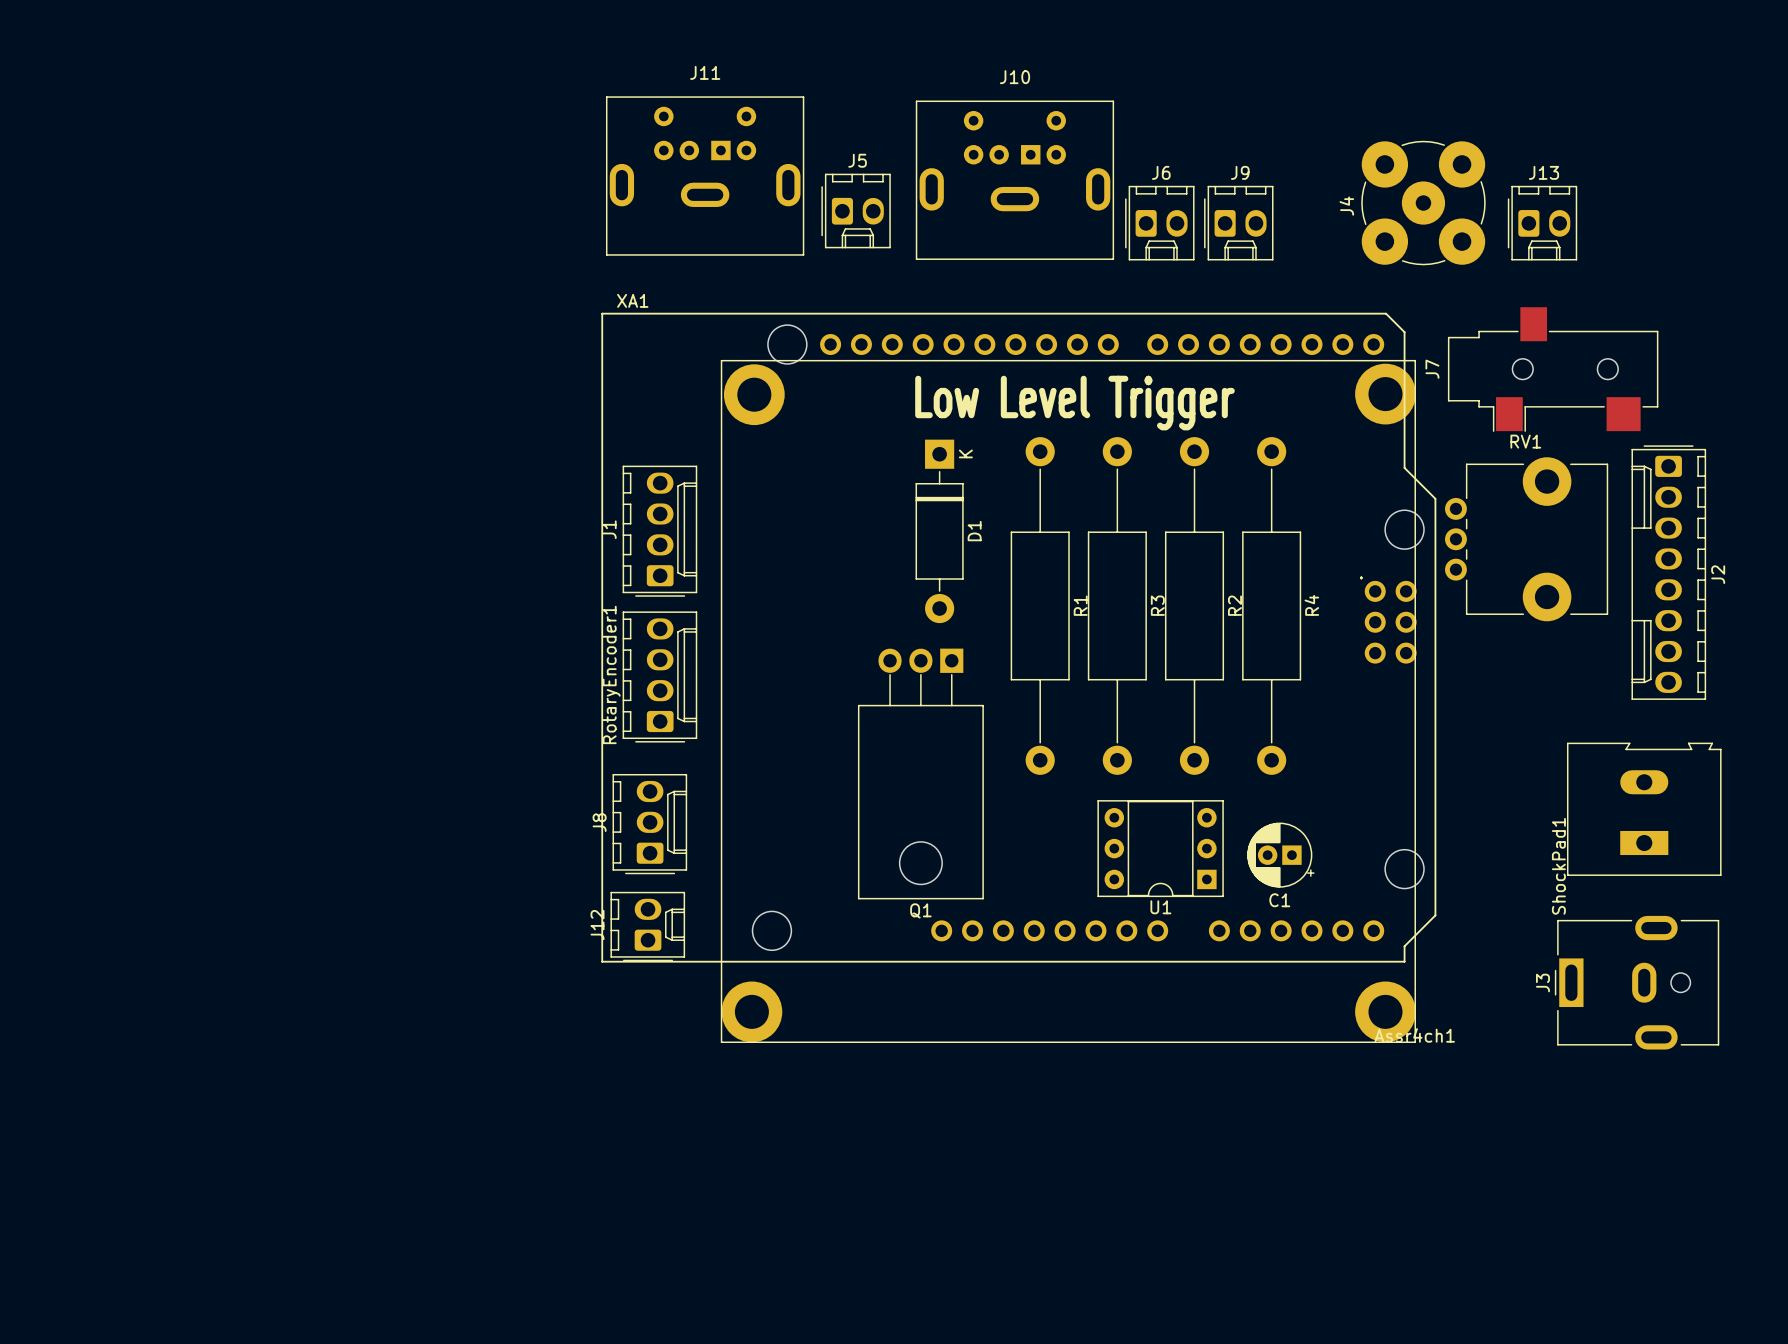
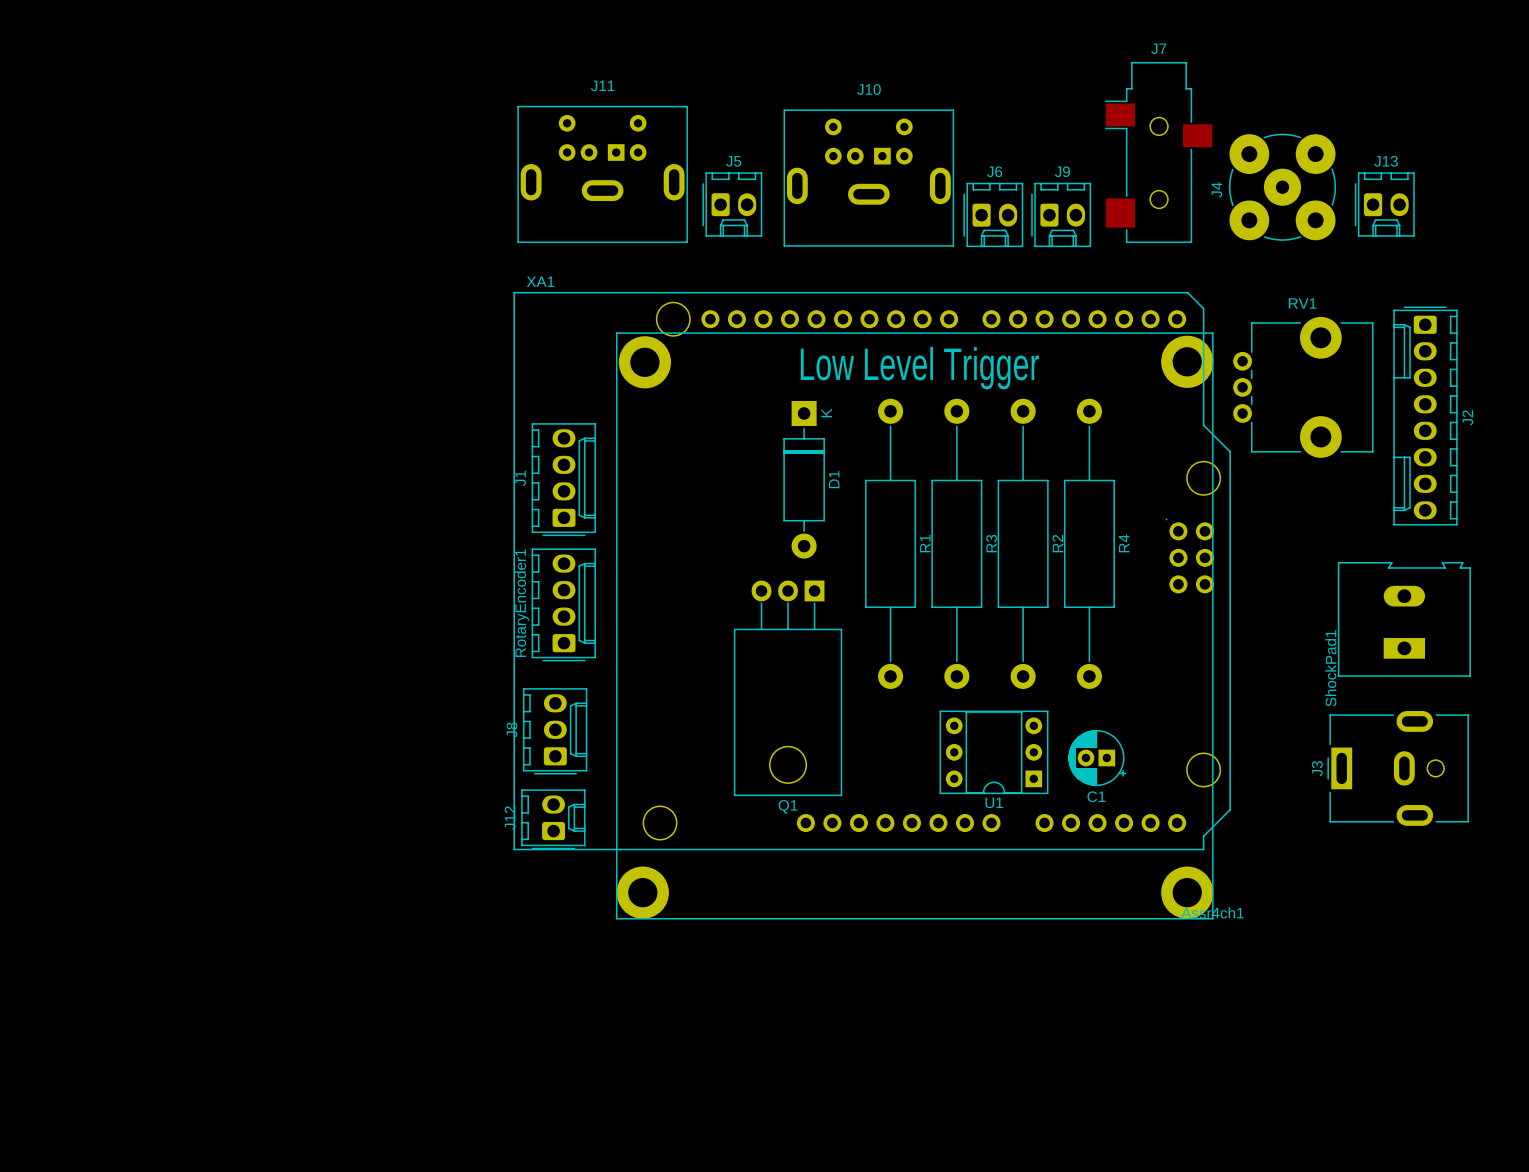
J4 position: (1423, 203) -> (1282, 187)
J13 position: (1542, 223) -> (1384, 204)
J7 rotation: 0° (1553, 369) -> 90° clockwise (1158, 152)
J7 position: (1553, 369) -> (1158, 152)
RV1 position: (1526, 539) -> (1303, 387)
J2 position: (1668, 572) -> (1425, 416)
ShockPad1 position: (1644, 809) -> (1404, 619)
J3 position: (1637, 982) -> (1398, 768)

